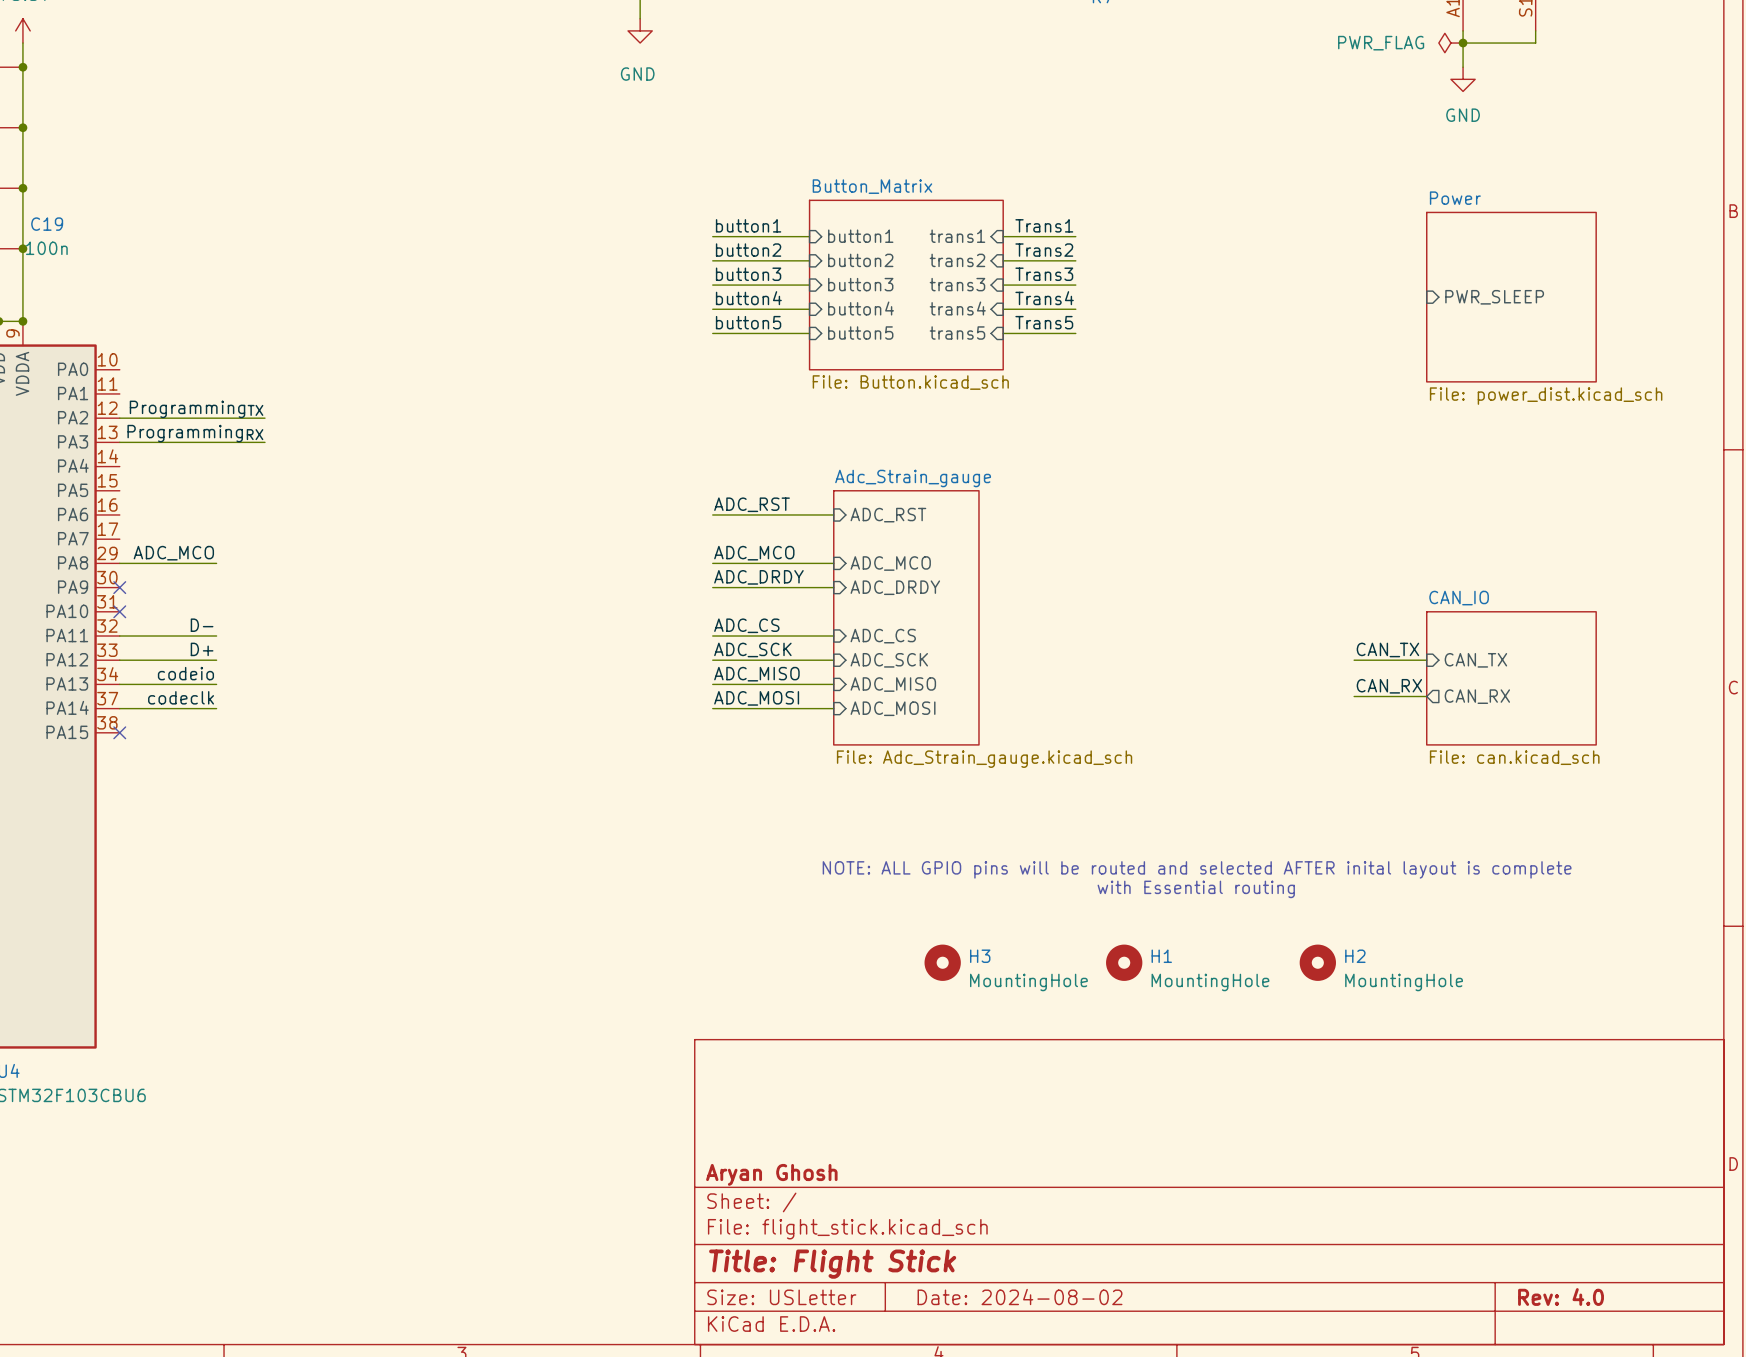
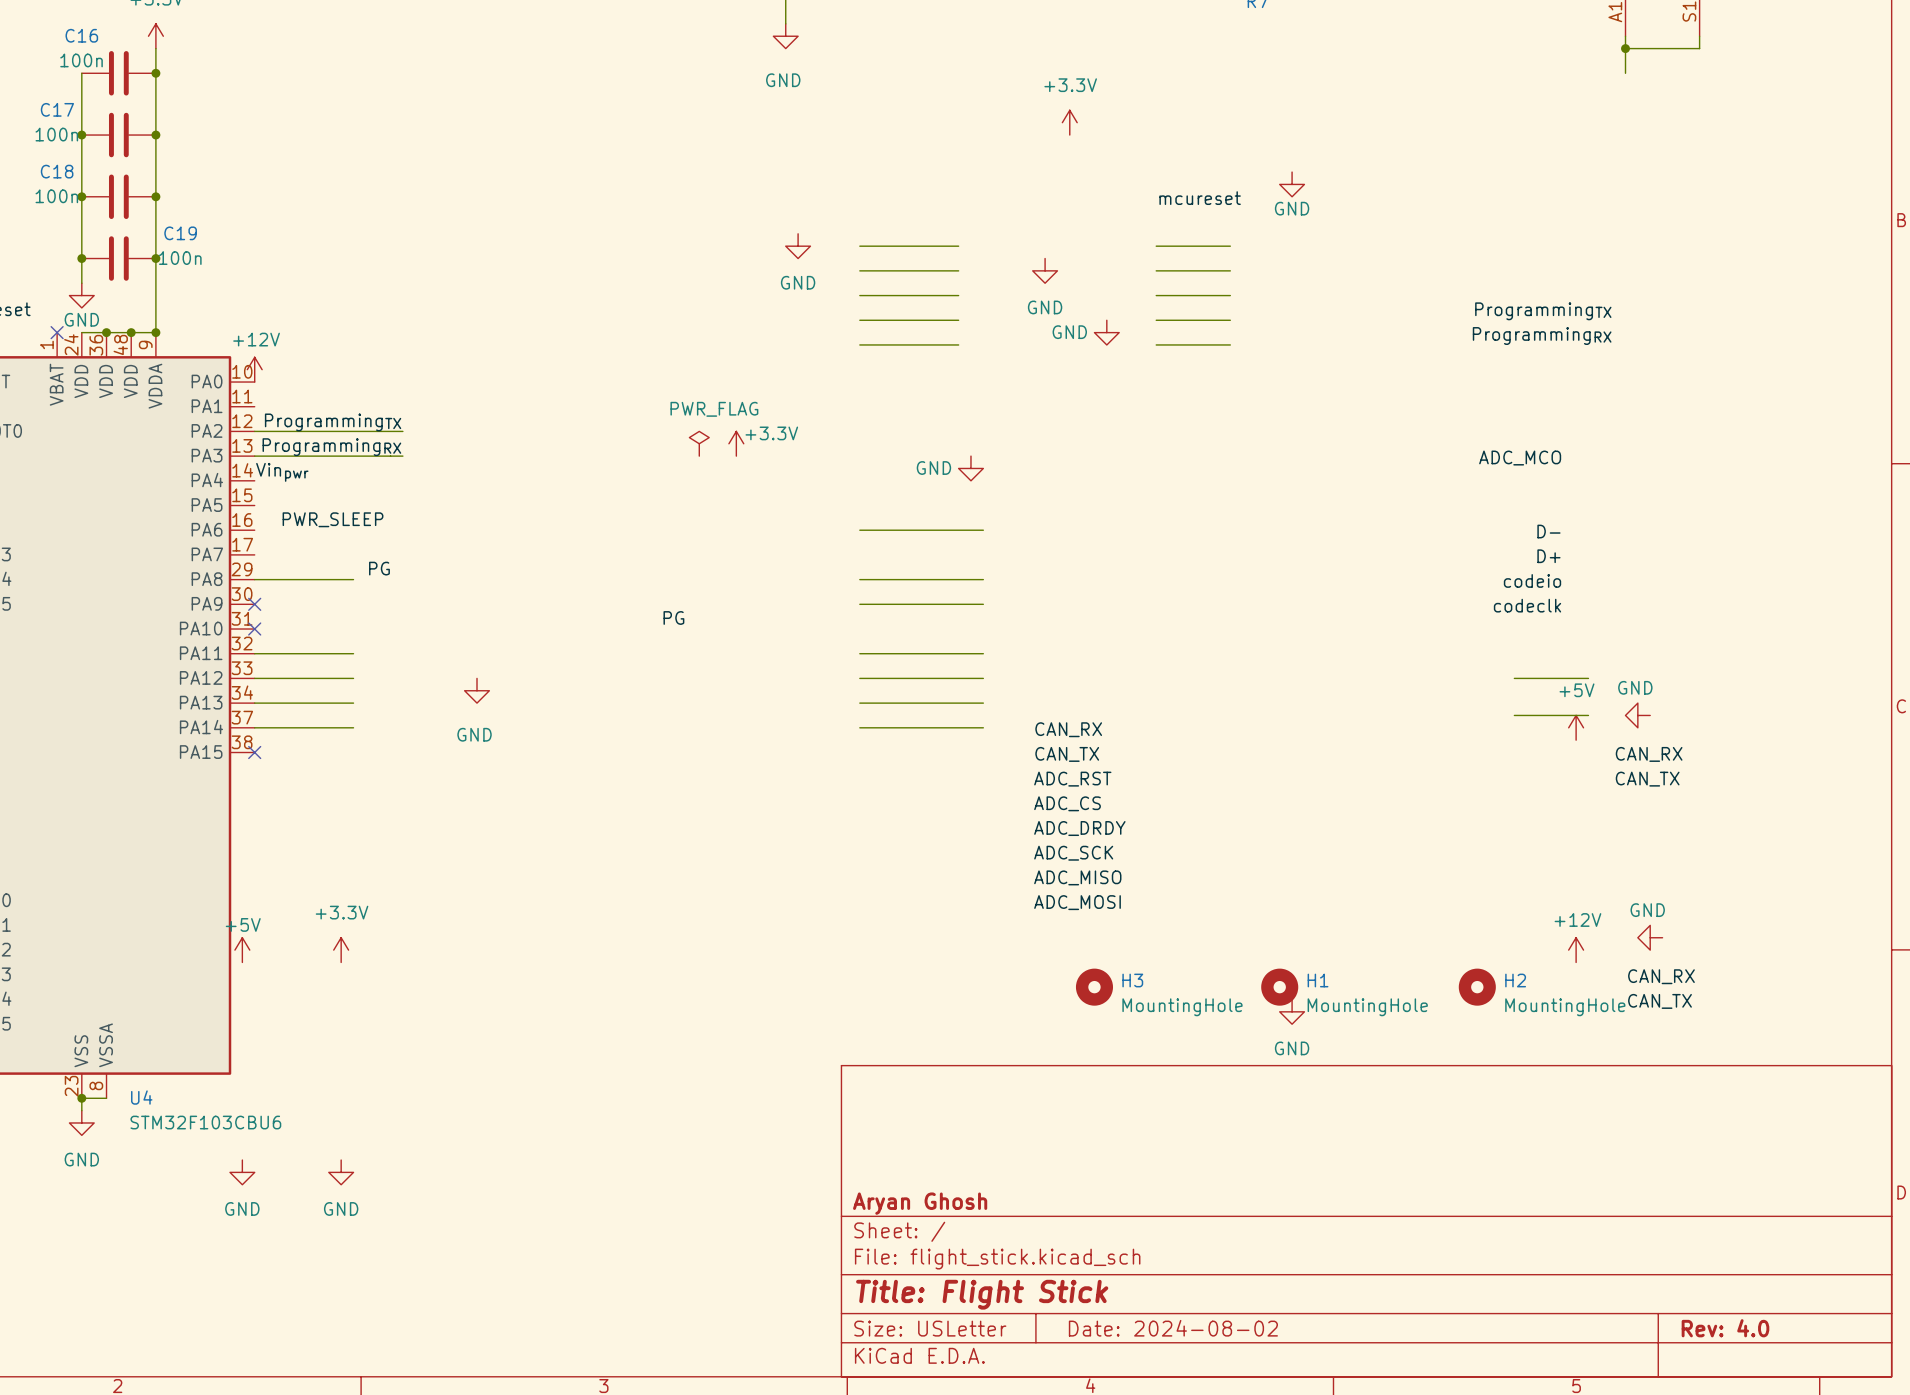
power symbol: PWR_FLAG (1450, 43) -> none
power symbol: GND (1463, 79) -> none
power symbol: none -> +3.3V (1069, 122)
power symbol: none -> GND (1292, 184)
label: none -> mcureset (1200, 198)
label: button1 (748, 225) -> none
label: Trans1 (1044, 225) -> none
power symbol: none -> GND (798, 246)
sheet pin: button1 (860, 236) -> none
sheet pin: trans1 (957, 236) -> none
label: button2 (748, 250) -> none
label: Trans2 (1044, 250) -> none
sheet pin: button2 (860, 260) -> none
power symbol: none -> GND (1045, 270)
sheet pin: trans2 (957, 260) -> none
label: button3 (748, 274) -> none
label: Trans3 (1044, 274) -> none
sheet pin: button3 (860, 284) -> none
sheet pin: trans3 (957, 284) -> none
sheet Button_Matrix: File: Button.kicad_sch (906, 285) -> none
sheet pin: PWR_SLEEP (1494, 297) -> none
sheet Power: File: power_dist.kicad_sch (1511, 297) -> none
label: button4 (748, 298) -> none
label: Trans4 (1044, 298) -> none
label: none -> ProgrammingTX (1543, 311)
sheet pin: button4 (861, 308) -> none
sheet pin: trans4 (957, 308) -> none
power symbol: none -> GND (1106, 332)
label: button5 (748, 322) -> none
label: Trans5 (1044, 322) -> none
label: none -> ProgrammingRX (1542, 336)
sheet pin: button5 (860, 333) -> none
sheet pin: trans5 (957, 333) -> none
power symbol: none -> +12V (254, 369)
power symbol: none -> PWR_FLAG (699, 443)
power symbol: none -> +3.3V (736, 443)
label: none -> ADC_MCO (1520, 458)
power symbol: none -> GND (970, 468)
label: none -> Vinpwr (282, 472)
label: none -> PWR_SLEEP (333, 519)
label: ADC_RST (752, 504) -> none
sheet pin: ADC_RST (888, 515) -> none
label: none -> D- (1548, 531)
label: none -> D+ (1548, 556)
label: none -> PG (379, 568)
label: ADC_MCO (173, 553) -> none
label: ADC_MCO (754, 553) -> none
sheet pin: ADC_MCO (890, 563) -> none
label: none -> codeio (1532, 580)
label: ADC_DRDY (758, 577) -> none
sheet pin: ADC_DRDY (895, 587) -> none
label: none -> codeclk (1527, 605)
label: none -> PG (673, 617)
sheet Adc_Strain_gauge: File: Adc_Strain_gauge.kicad_sch (906, 617) -> none
label: D- (202, 625) -> none
label position: ADC_CS (746, 625) -> ADC_CS (1067, 803)
sheet pin: ADC_CS (883, 636) -> none
label: D+ (202, 649) -> none
label: ADC_SCK (752, 649) -> none
label position: CAN_TX (1387, 649) -> CAN_TX (1647, 779)
sheet pin: ADC_SCK (889, 660) -> none
sheet pin: CAN_TX (1475, 660) -> none
power symbol: none -> GND (477, 690)
label: codeio (185, 673) -> none
label: ADC_MISO (756, 674) -> none
sheet CAN_IO: File: can.kicad_sch (1511, 678) -> none
sheet pin: ADC_MISO (893, 684) -> none
label position: CAN_RX (1389, 686) -> CAN_RX (1649, 754)
power symbol: none -> GND (1637, 715)
sheet pin: CAN_RX (1477, 696) -> none
label: codeclk (181, 697) -> none
label: ADC_MOSI (756, 698) -> none
sheet pin: ADC_MOSI (893, 708) -> none
power symbol: none -> +5V (1576, 727)
label: none -> CAN_RX (1068, 729)
label: none -> CAN_TX (1067, 754)
label: none -> ADC_RST (1072, 779)
label: none -> ADC_DRDY (1079, 828)
label: none -> ADC_SCK (1073, 853)
label: none -> ADC_MISO (1077, 877)
text: NOTE: ALL GPIO pins will be routed and selected AFTER inital layout is complete (1197, 869) -> none
label: none -> ADC_MOSI (1077, 902)
text: with Essential routing (1196, 889) -> none
power symbol: none -> GND (1650, 937)
power symbol: none -> +5V (242, 950)
power symbol: none -> +3.3V (341, 950)
power symbol: none -> +12V (1576, 950)
label: none -> CAN_RX (1661, 976)
label: none -> CAN_TX (1660, 1001)
power symbol: none -> GND (1292, 1011)
power symbol: none -> GND (242, 1172)
power symbol: none -> GND (341, 1172)

